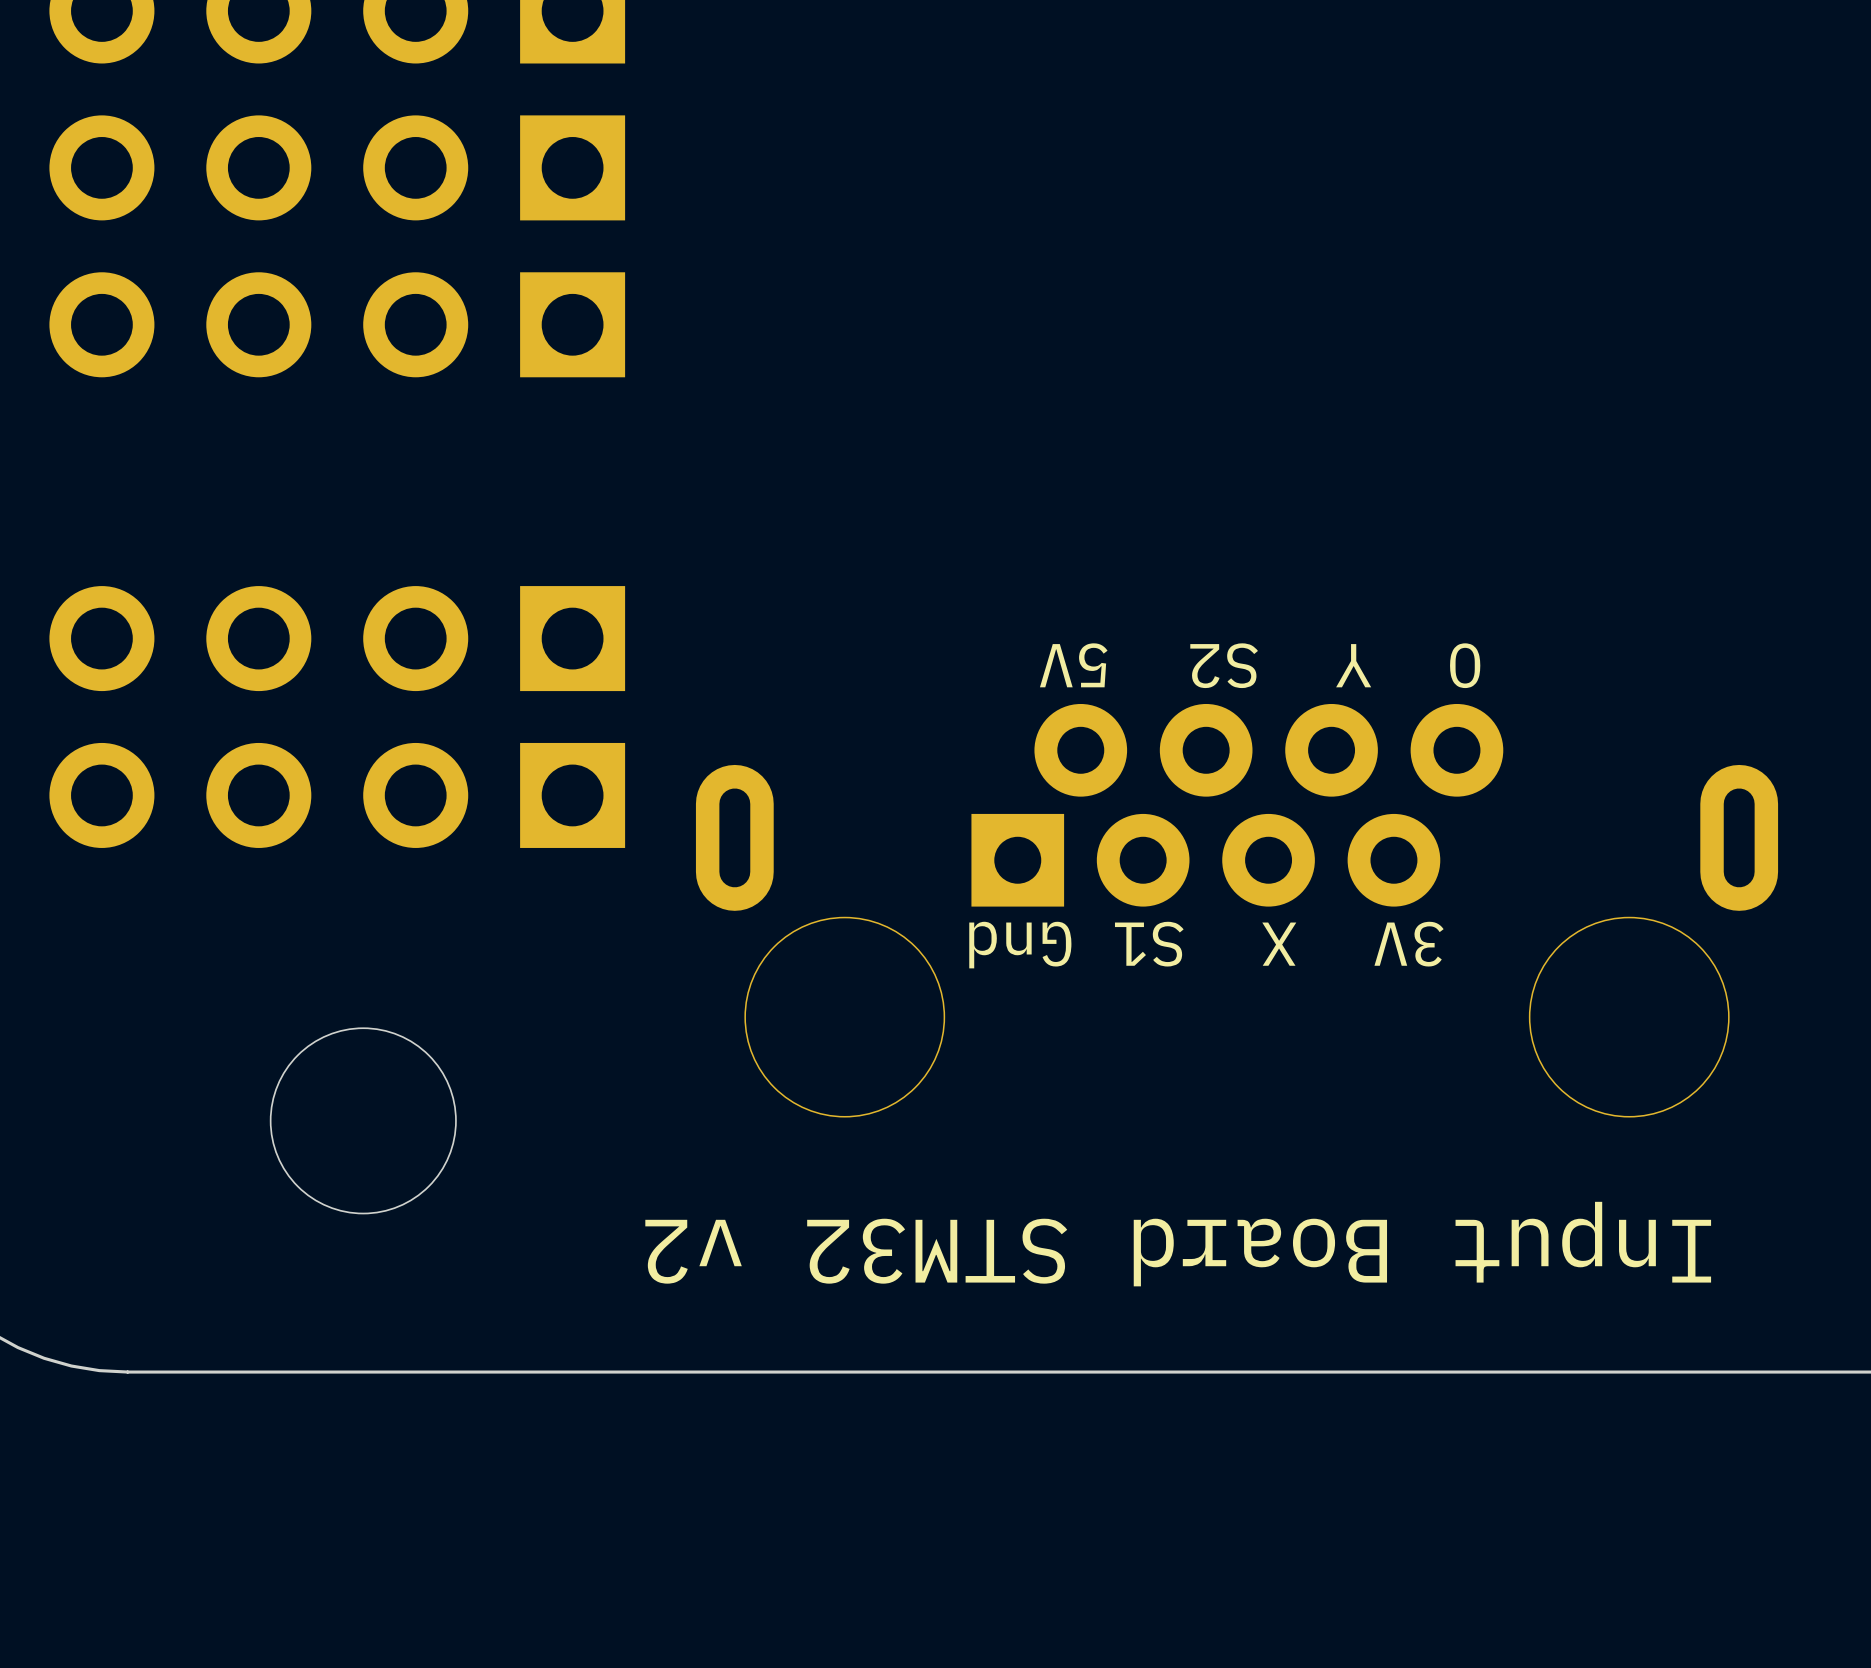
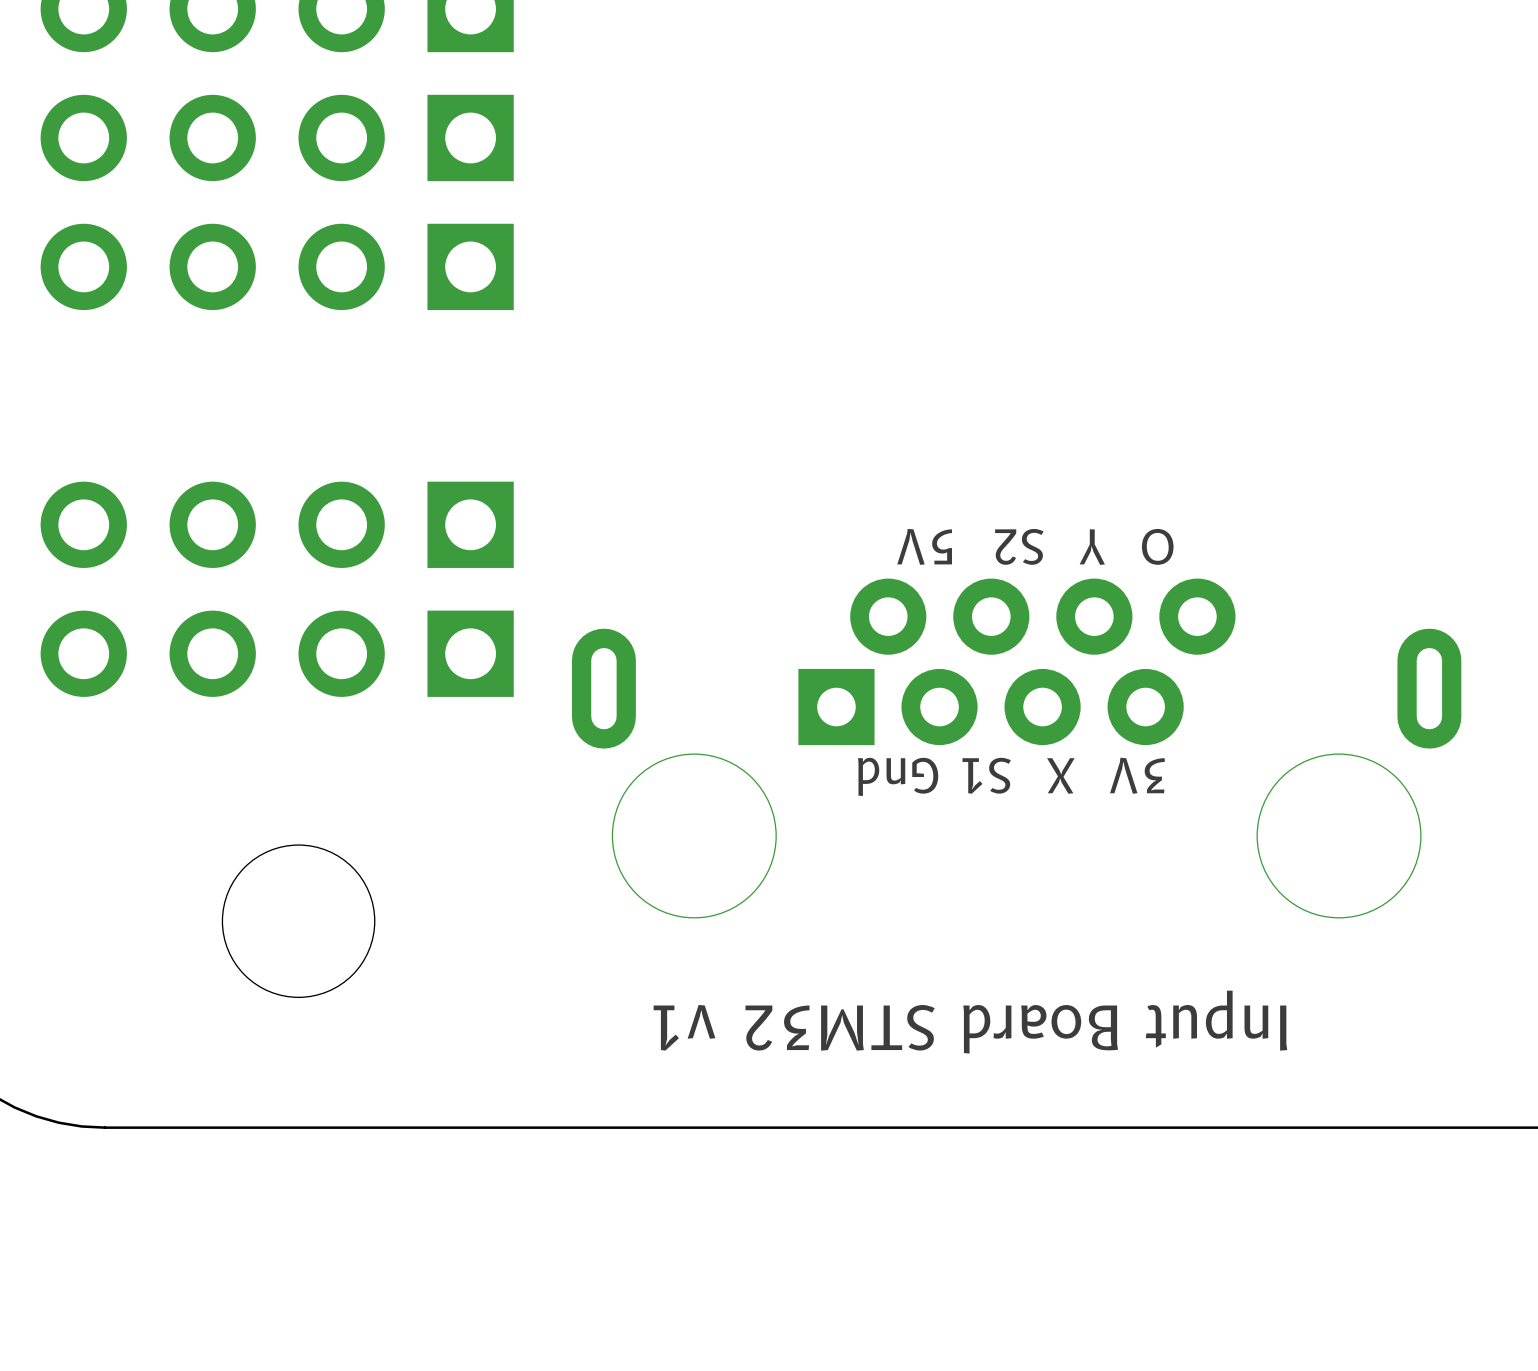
text: Input Board STM32 v2 (1178, 1244) -> Input Board STM32 v1 (970, 1022)

